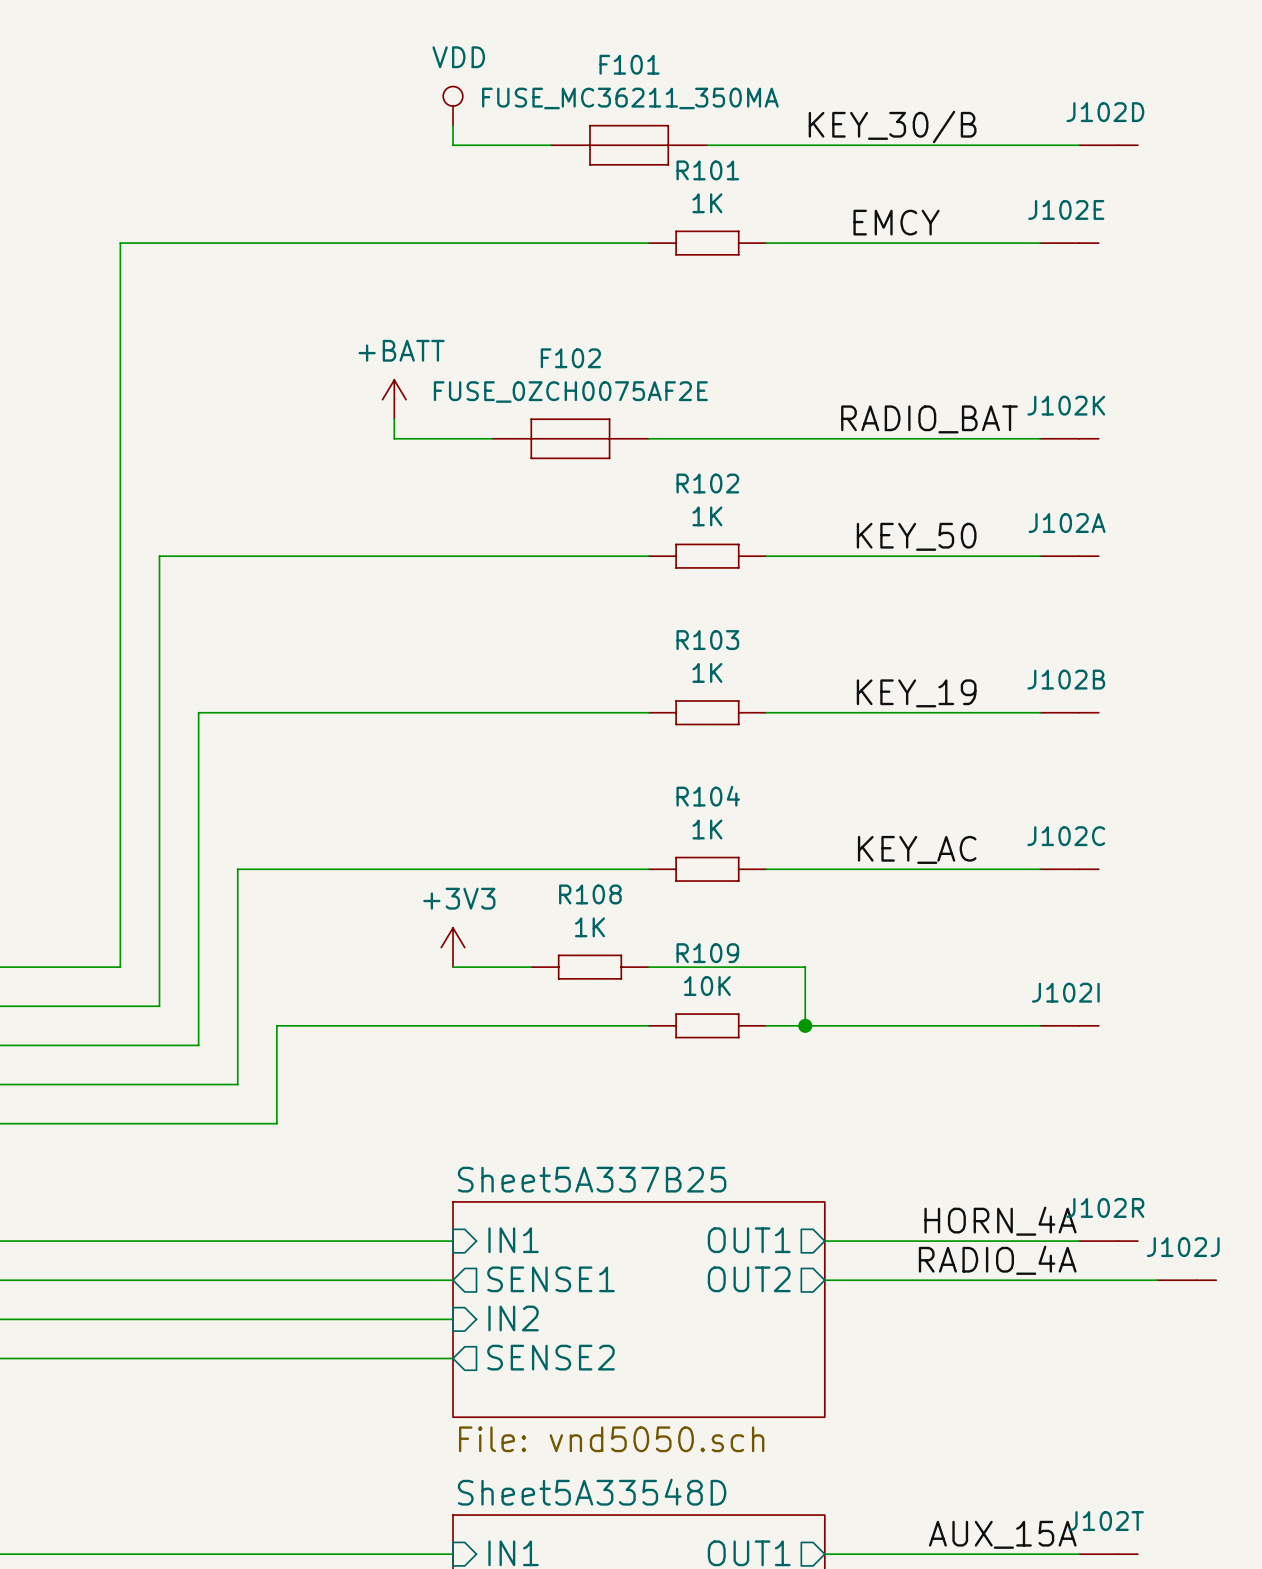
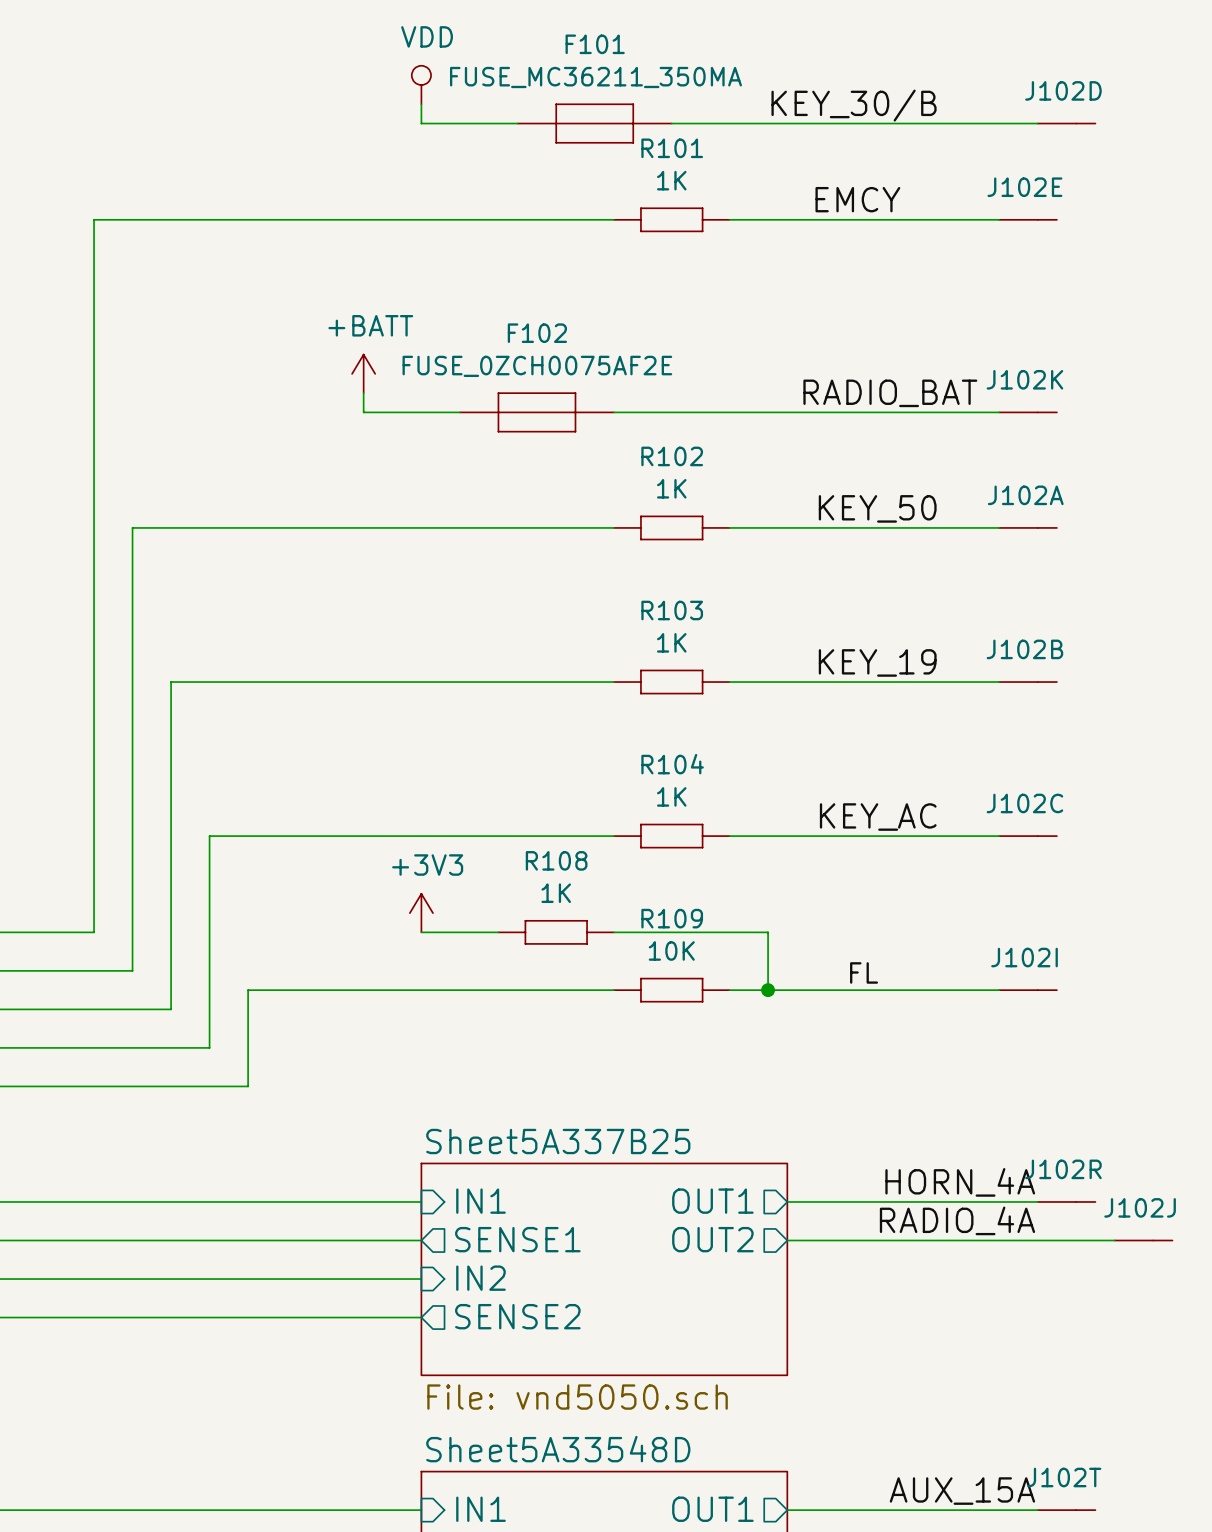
label: none -> FL (864, 972)

